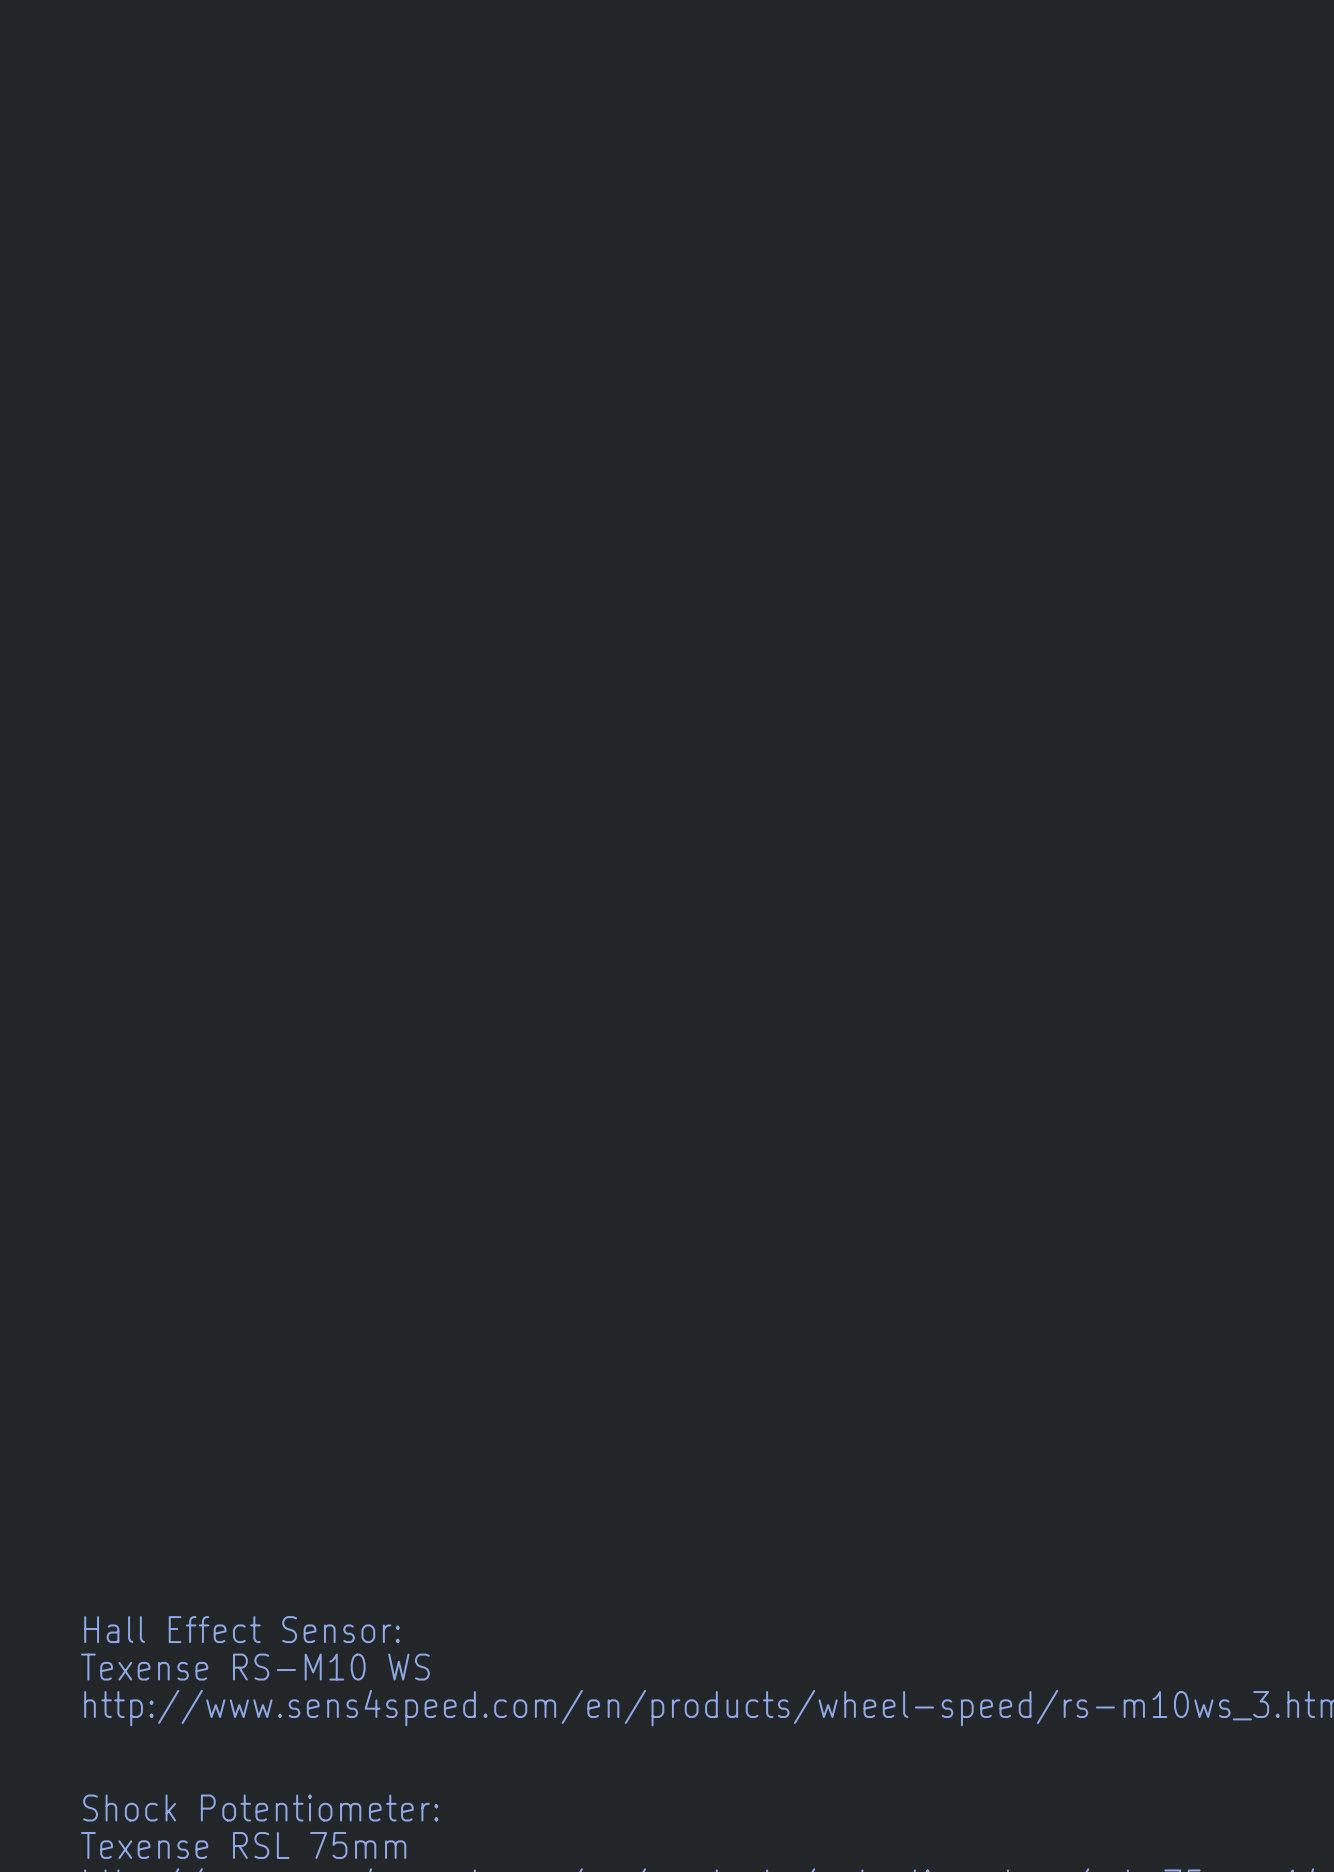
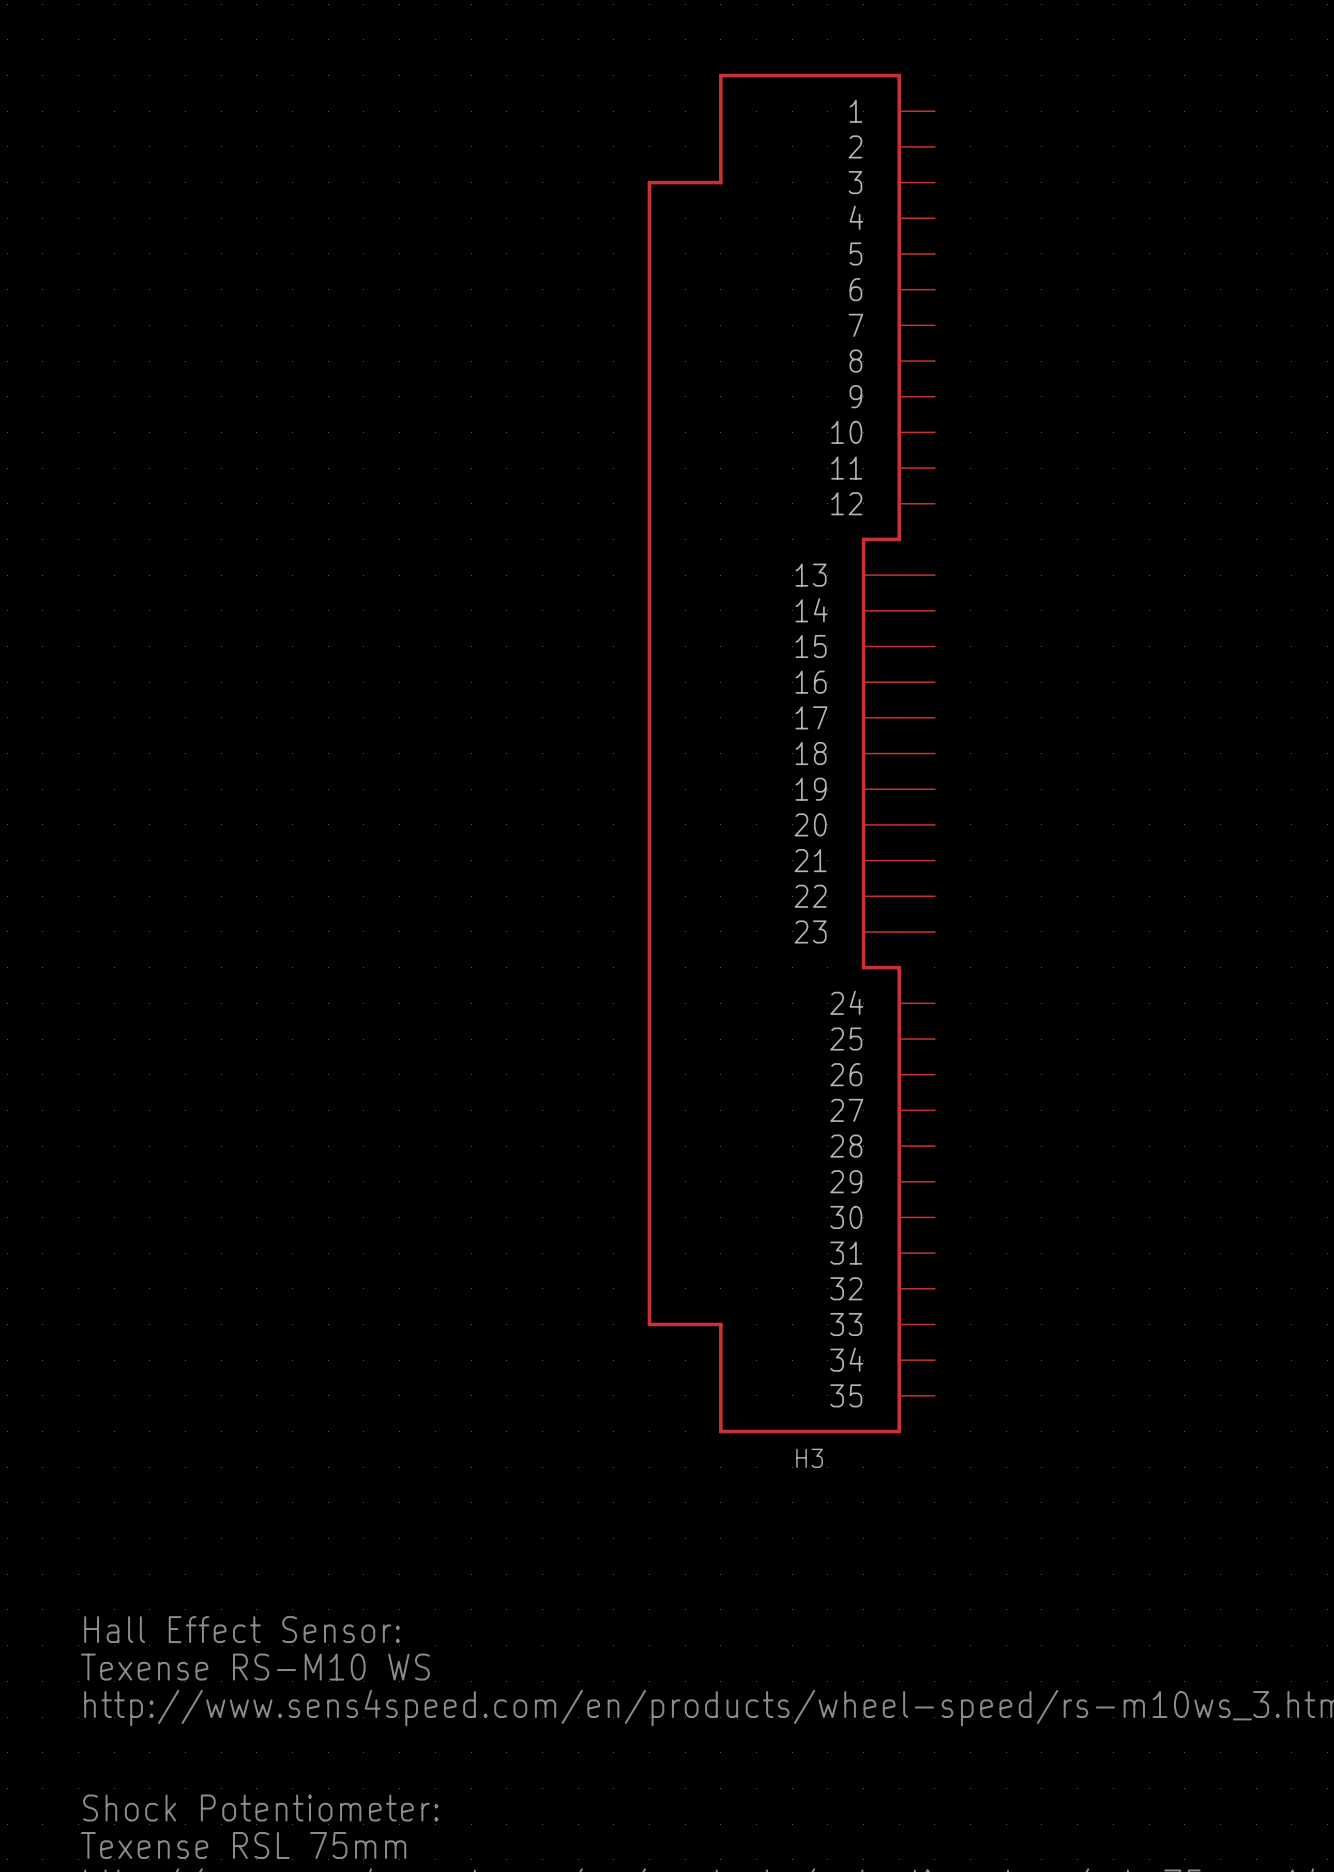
H3: none -> (791, 753)

